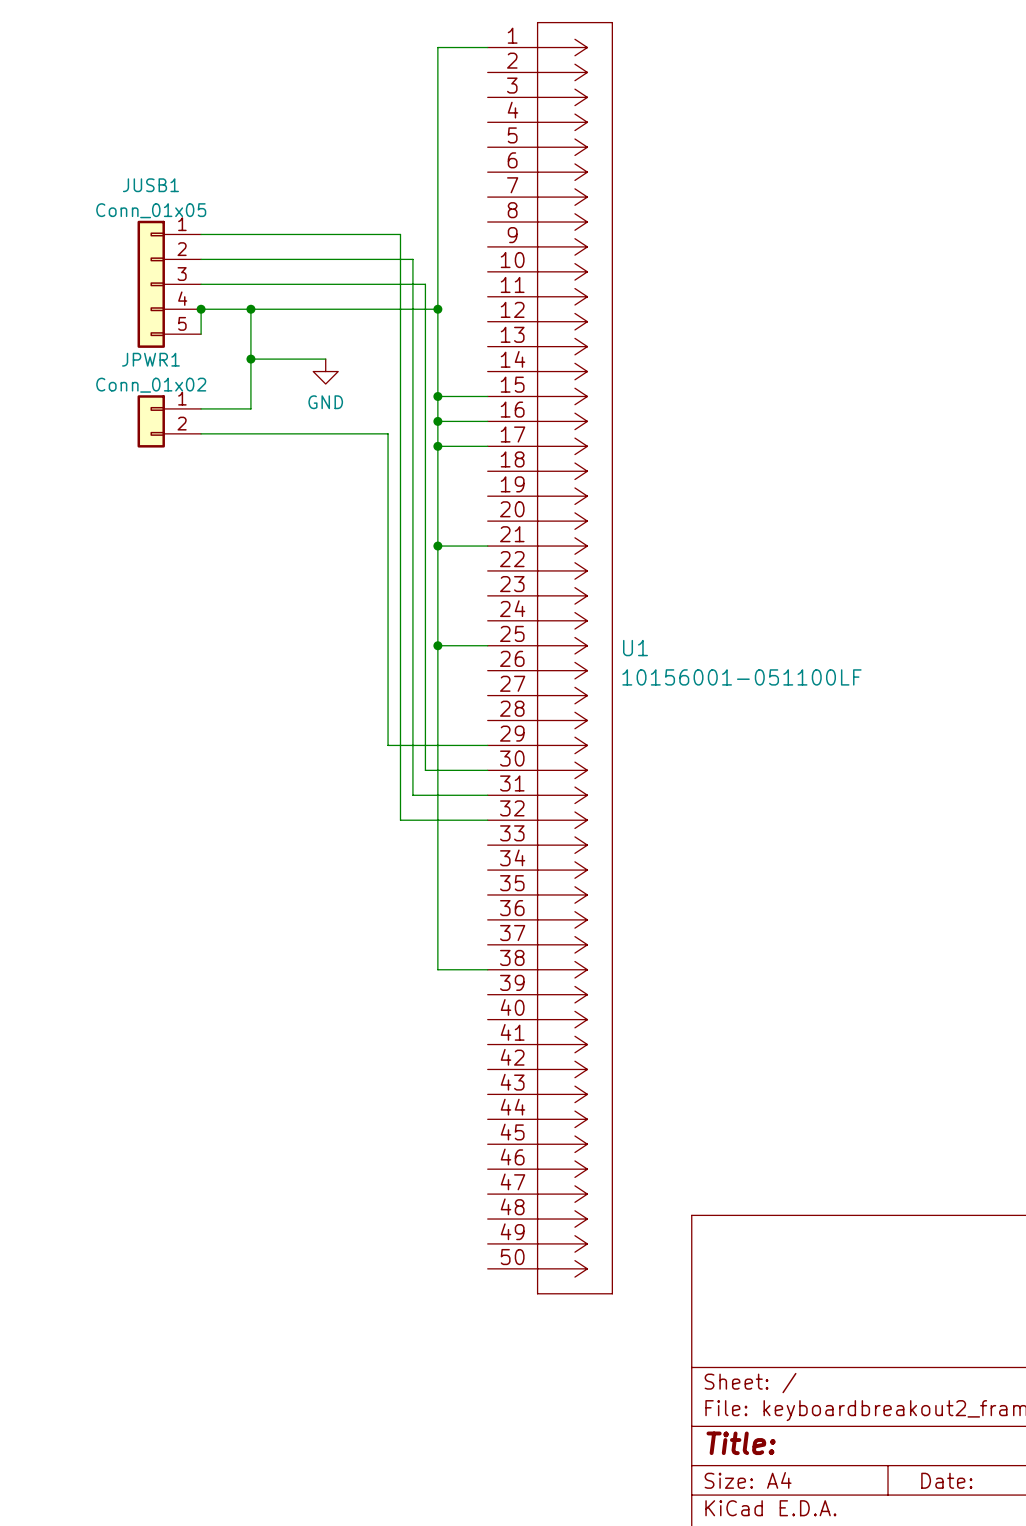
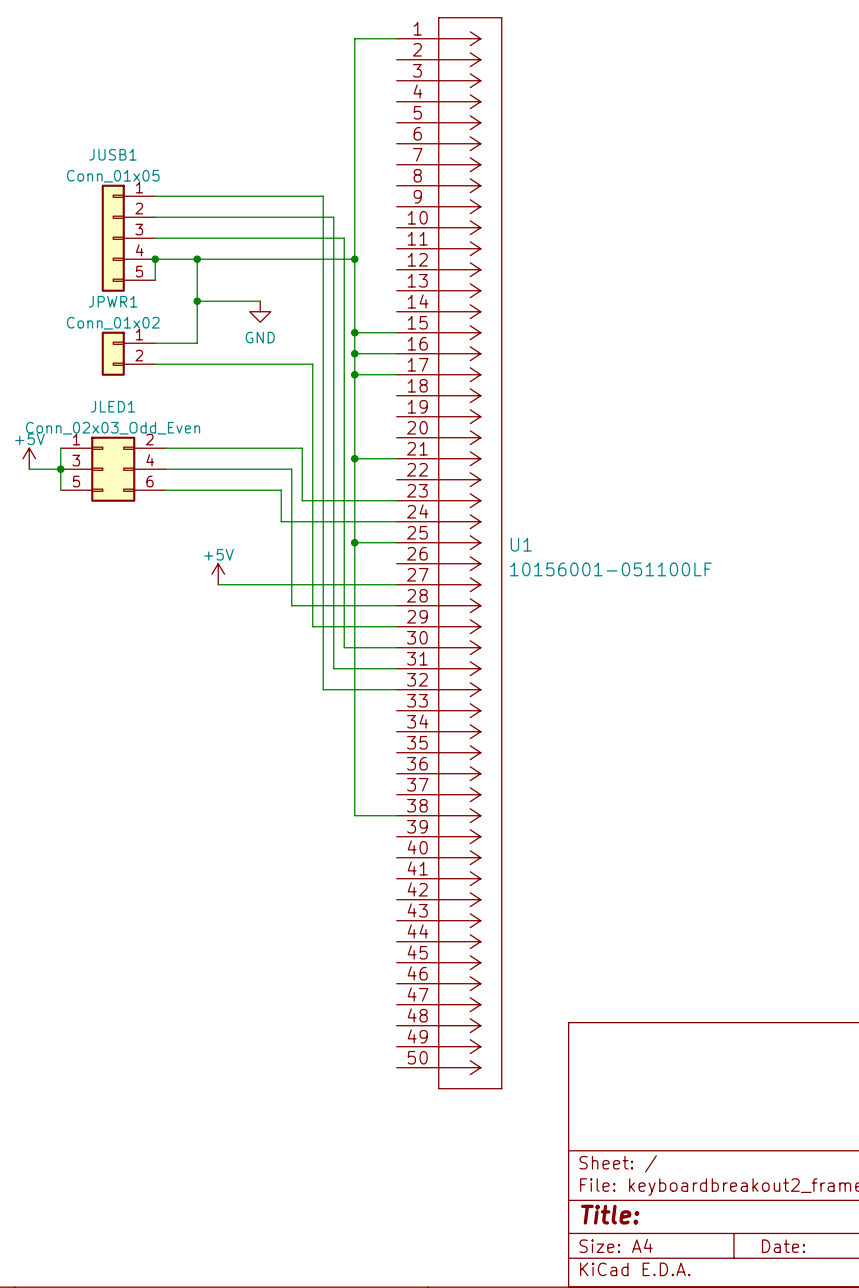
wire: none -> (60, 448) (60, 490)
wire: none -> (165, 448) (302, 448) (302, 500) (396, 500)
power symbol: none -> +5V (29, 458)
wire: none -> (29, 469) (60, 469)
junction: none -> (60, 469)
JLED1: none -> Conn_02x03_Odd_Even (113, 469)
wire: none -> (165, 469) (291, 469) (291, 605) (396, 605)
wire: none -> (165, 490) (281, 490) (281, 521) (396, 521)
power symbol: none -> +5V (218, 574)
wire: none -> (218, 584) (396, 584)

